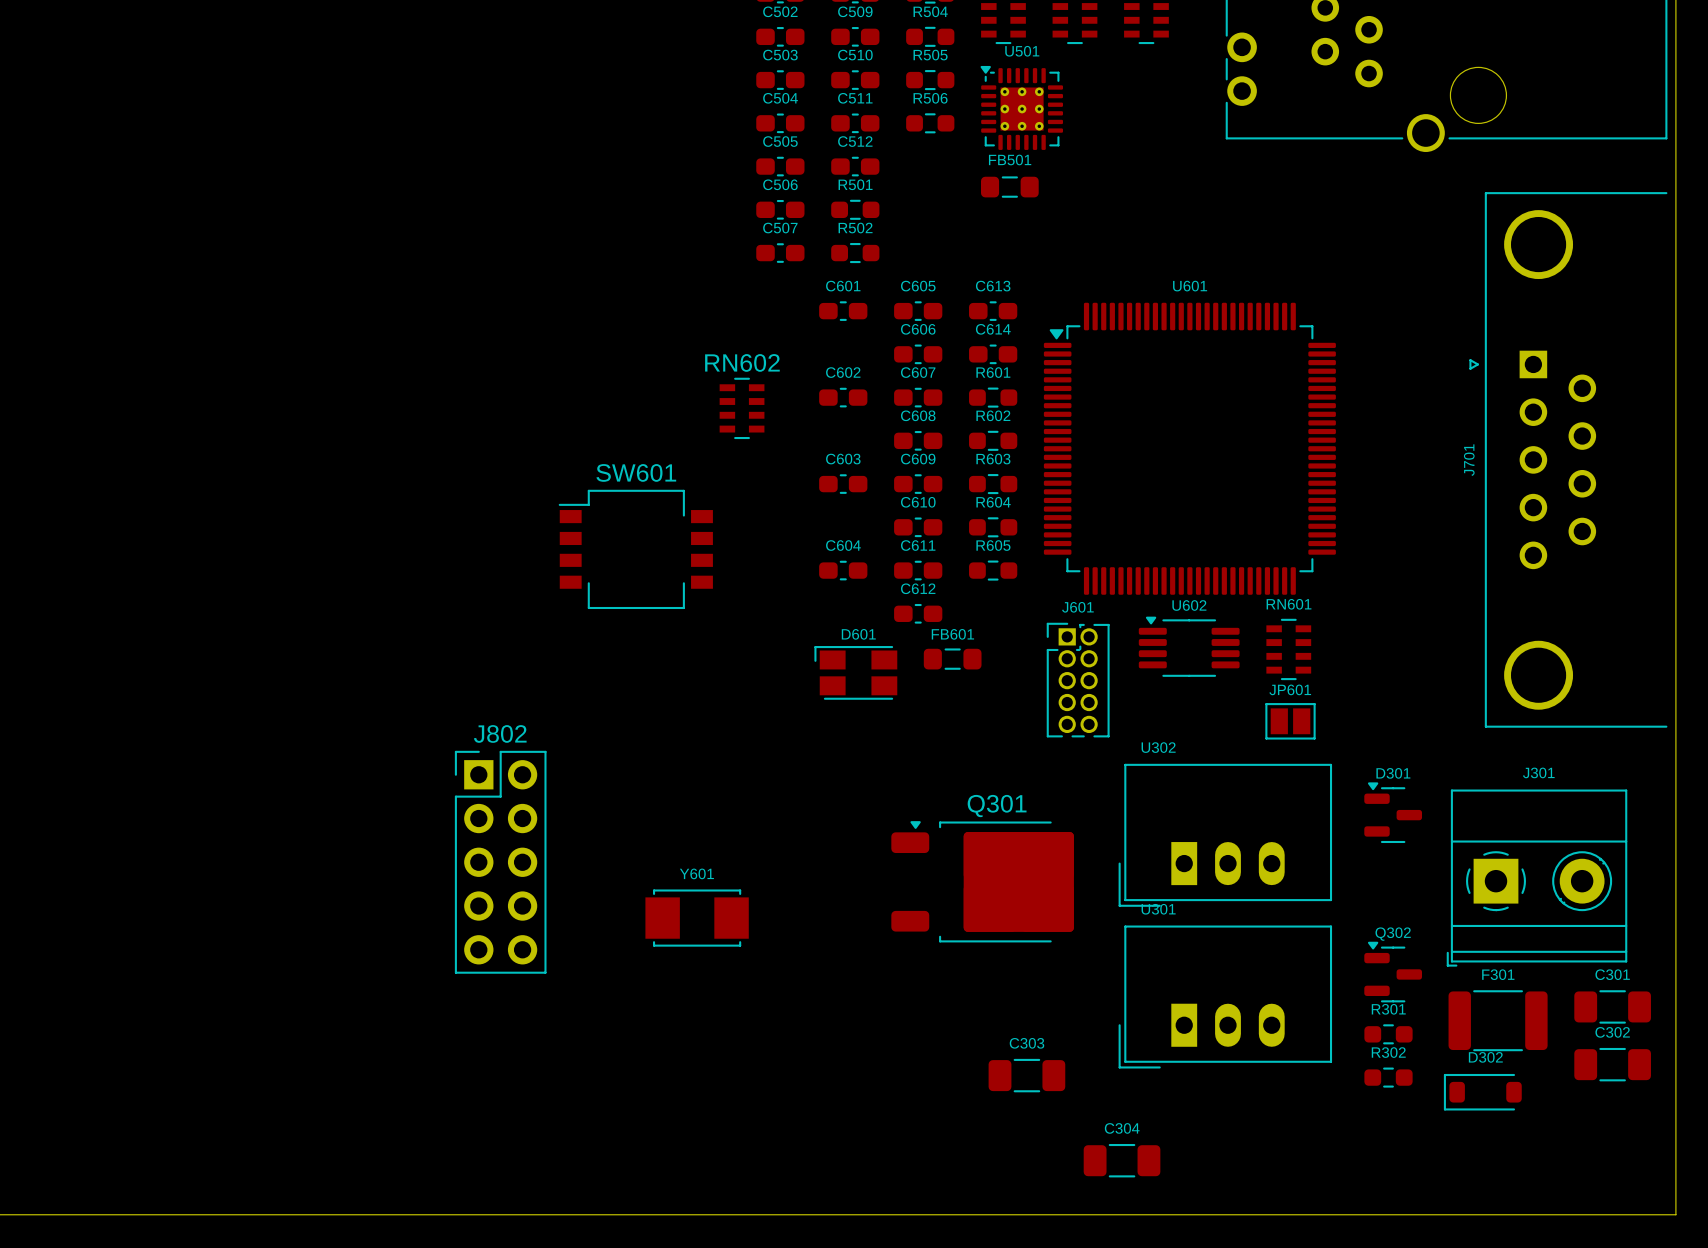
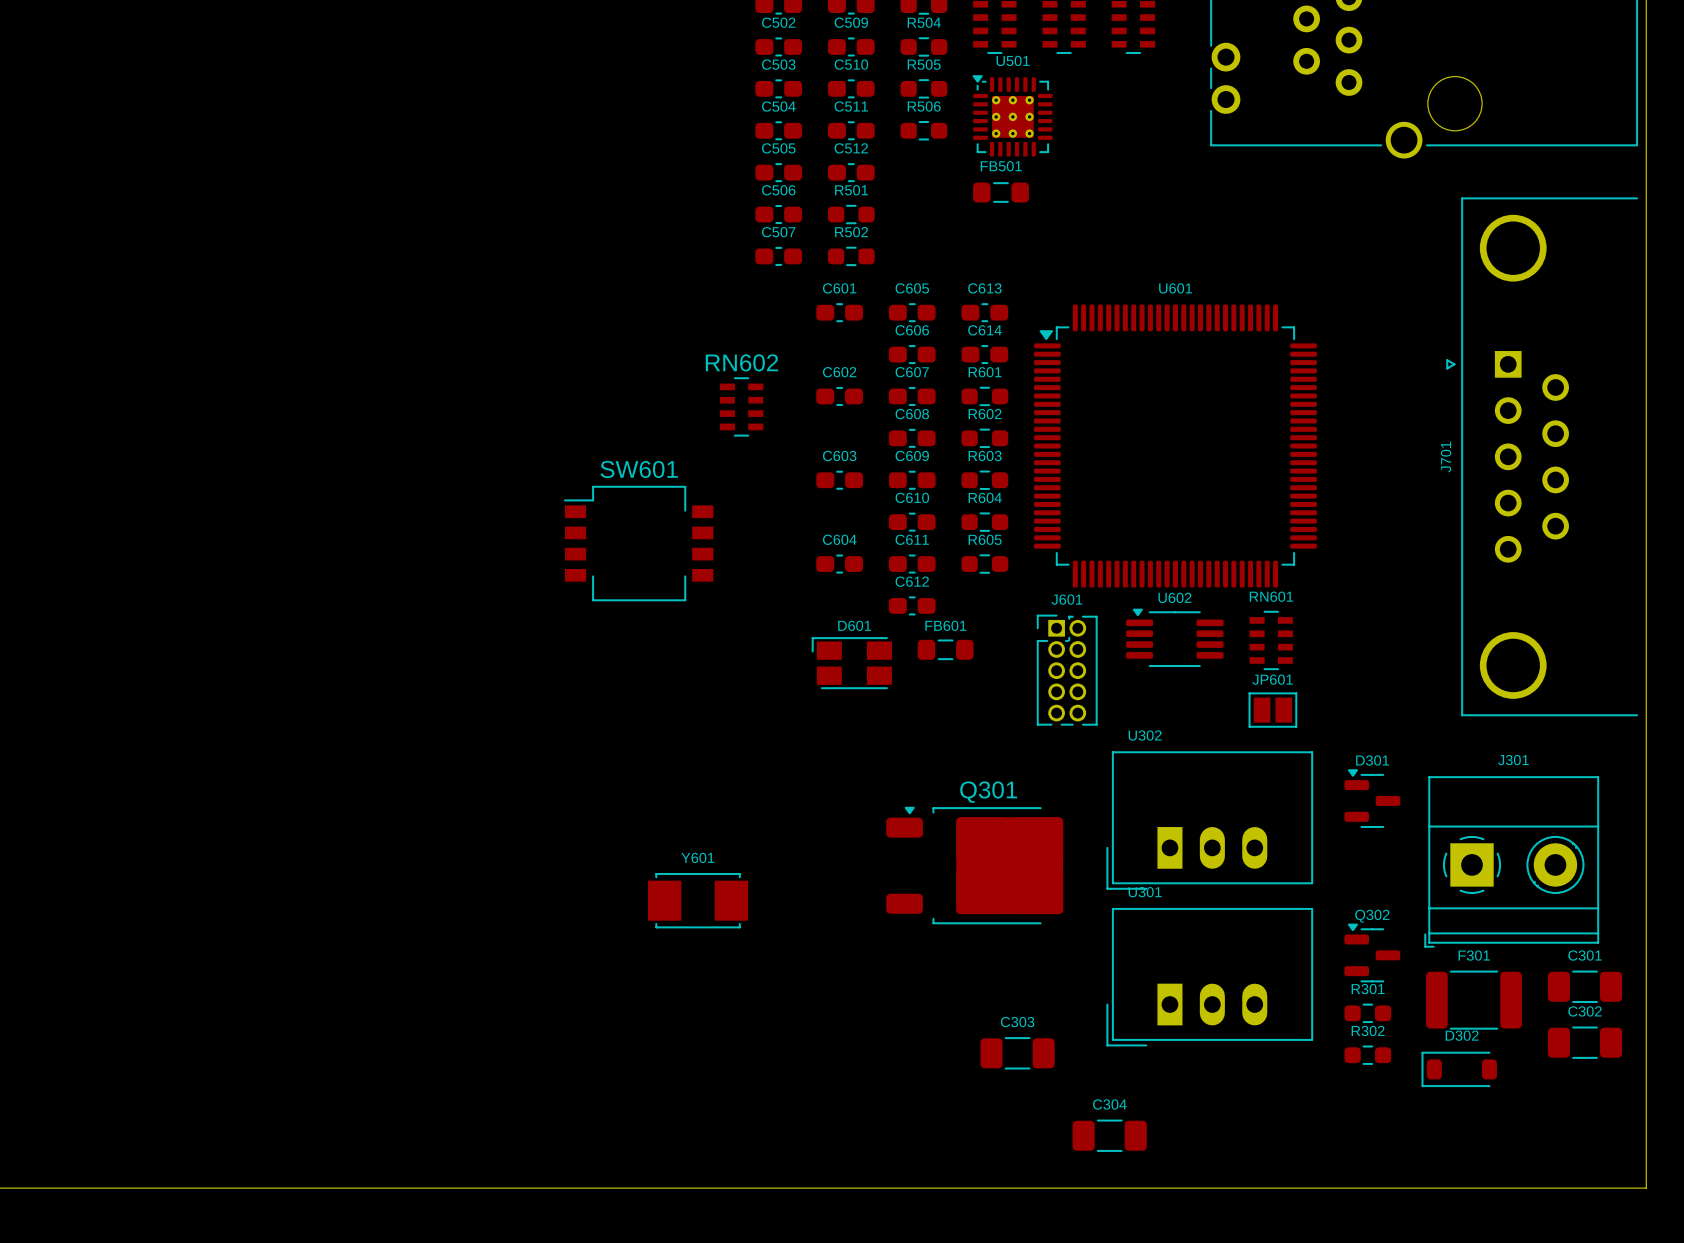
J802: (500, 862) -> none

